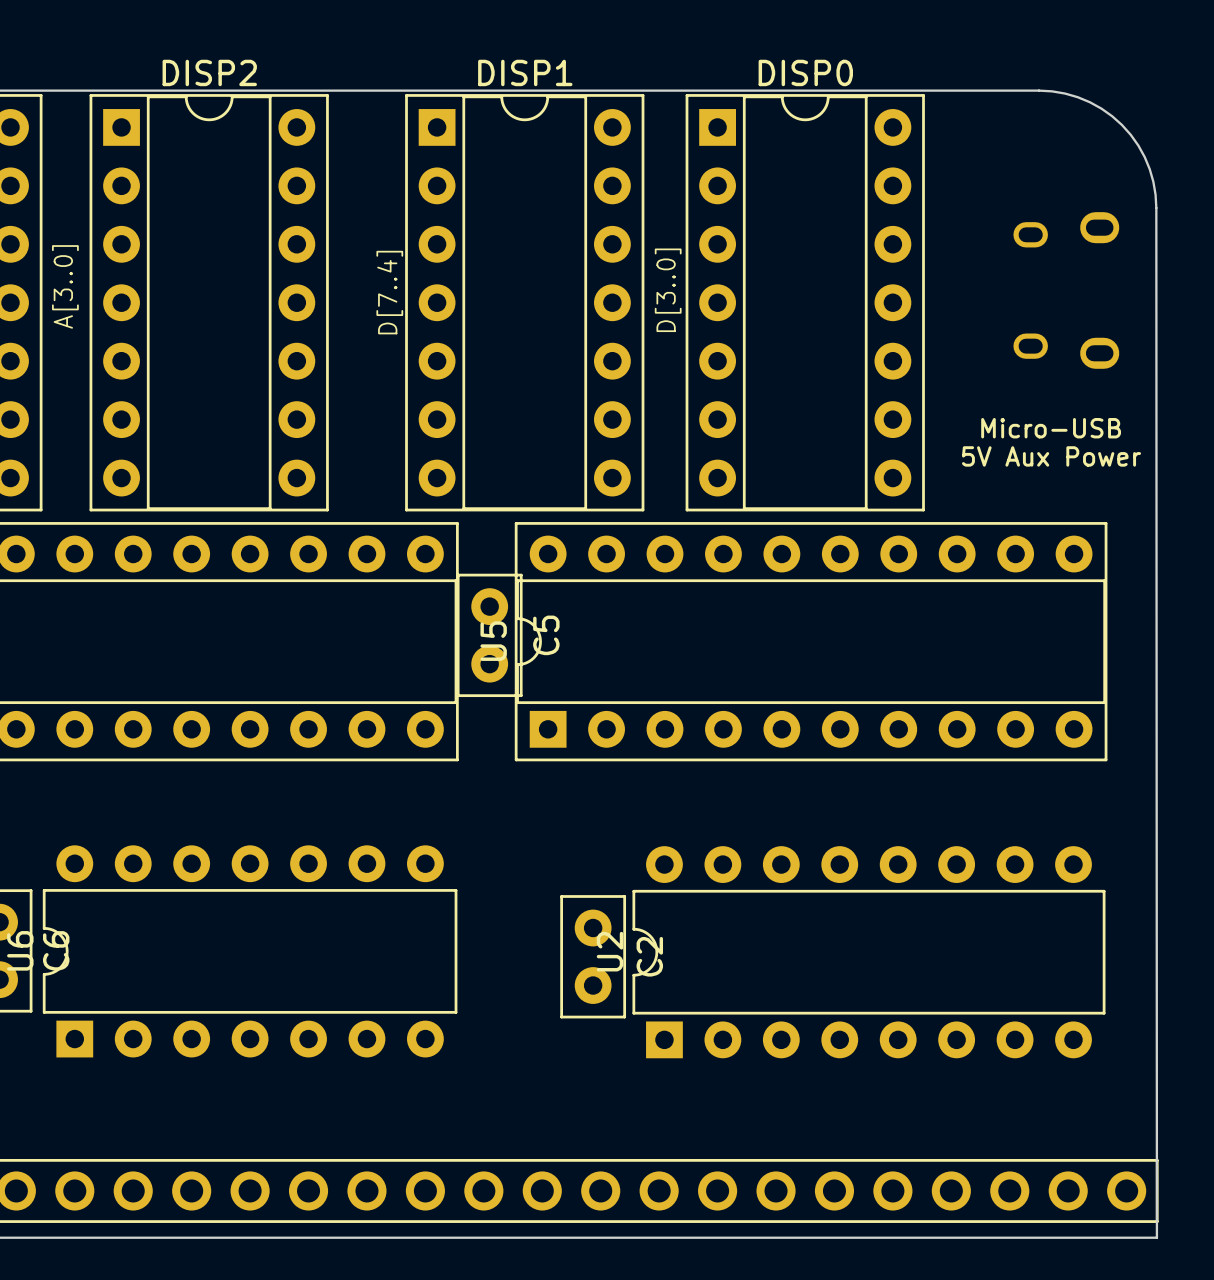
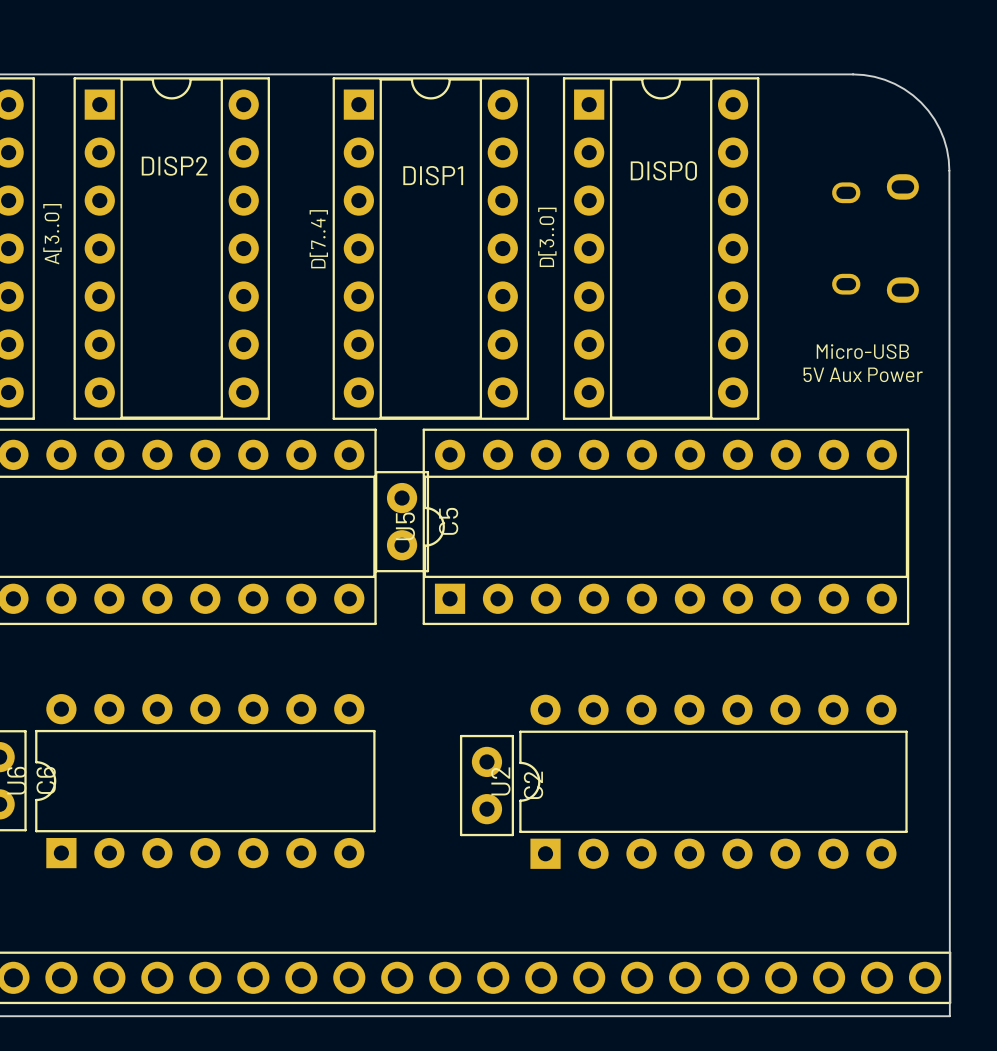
DISP2 name position: DISP2 (209, 72) -> DISP2 (174, 166)
DISP1 name position: DISP1 (525, 72) -> DISP1 (433, 175)
DISP0 name position: DISP0 (805, 72) -> DISP0 (663, 170)

